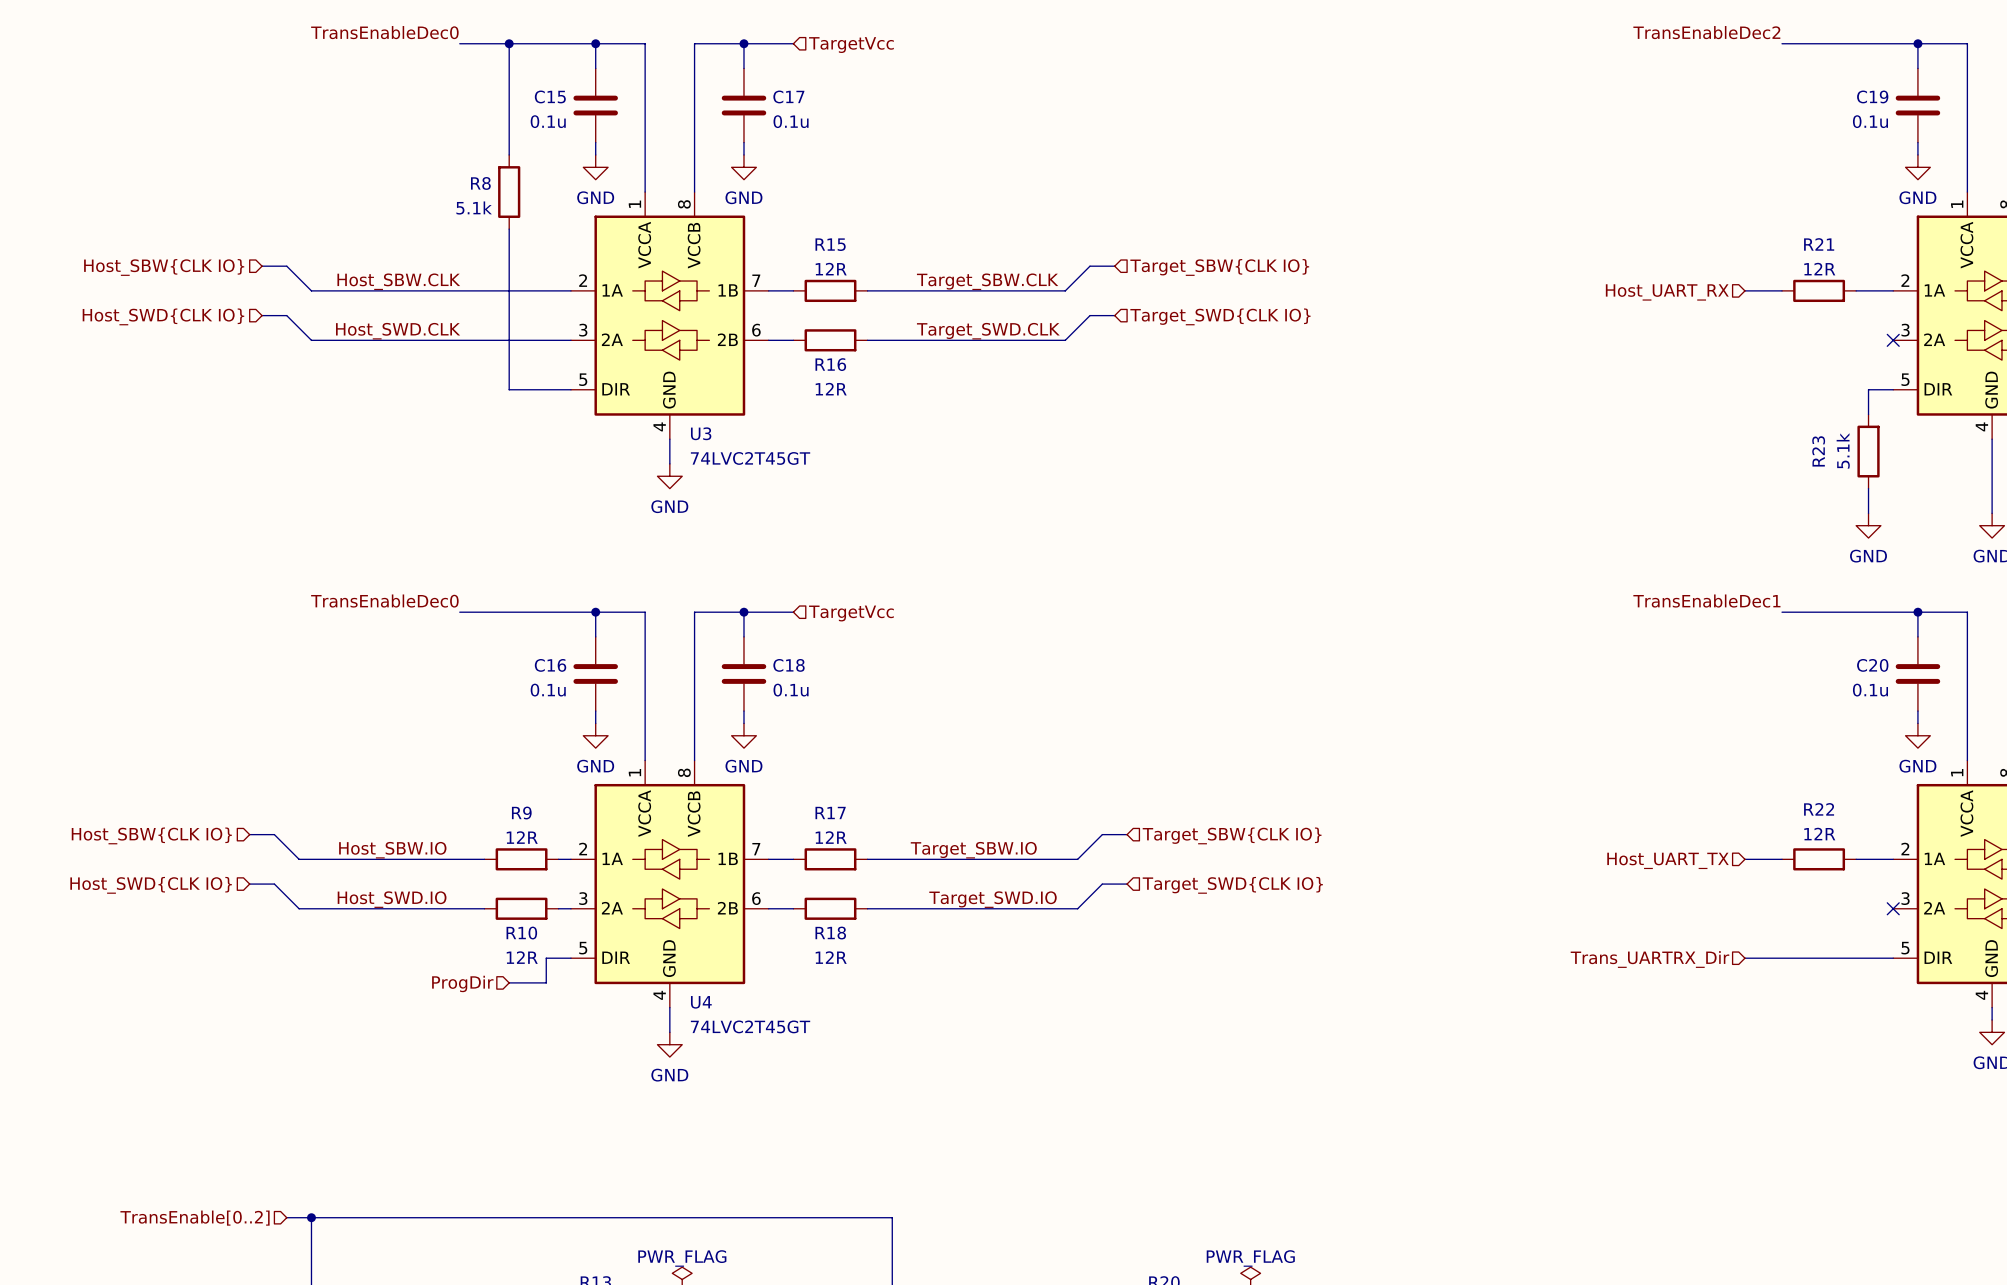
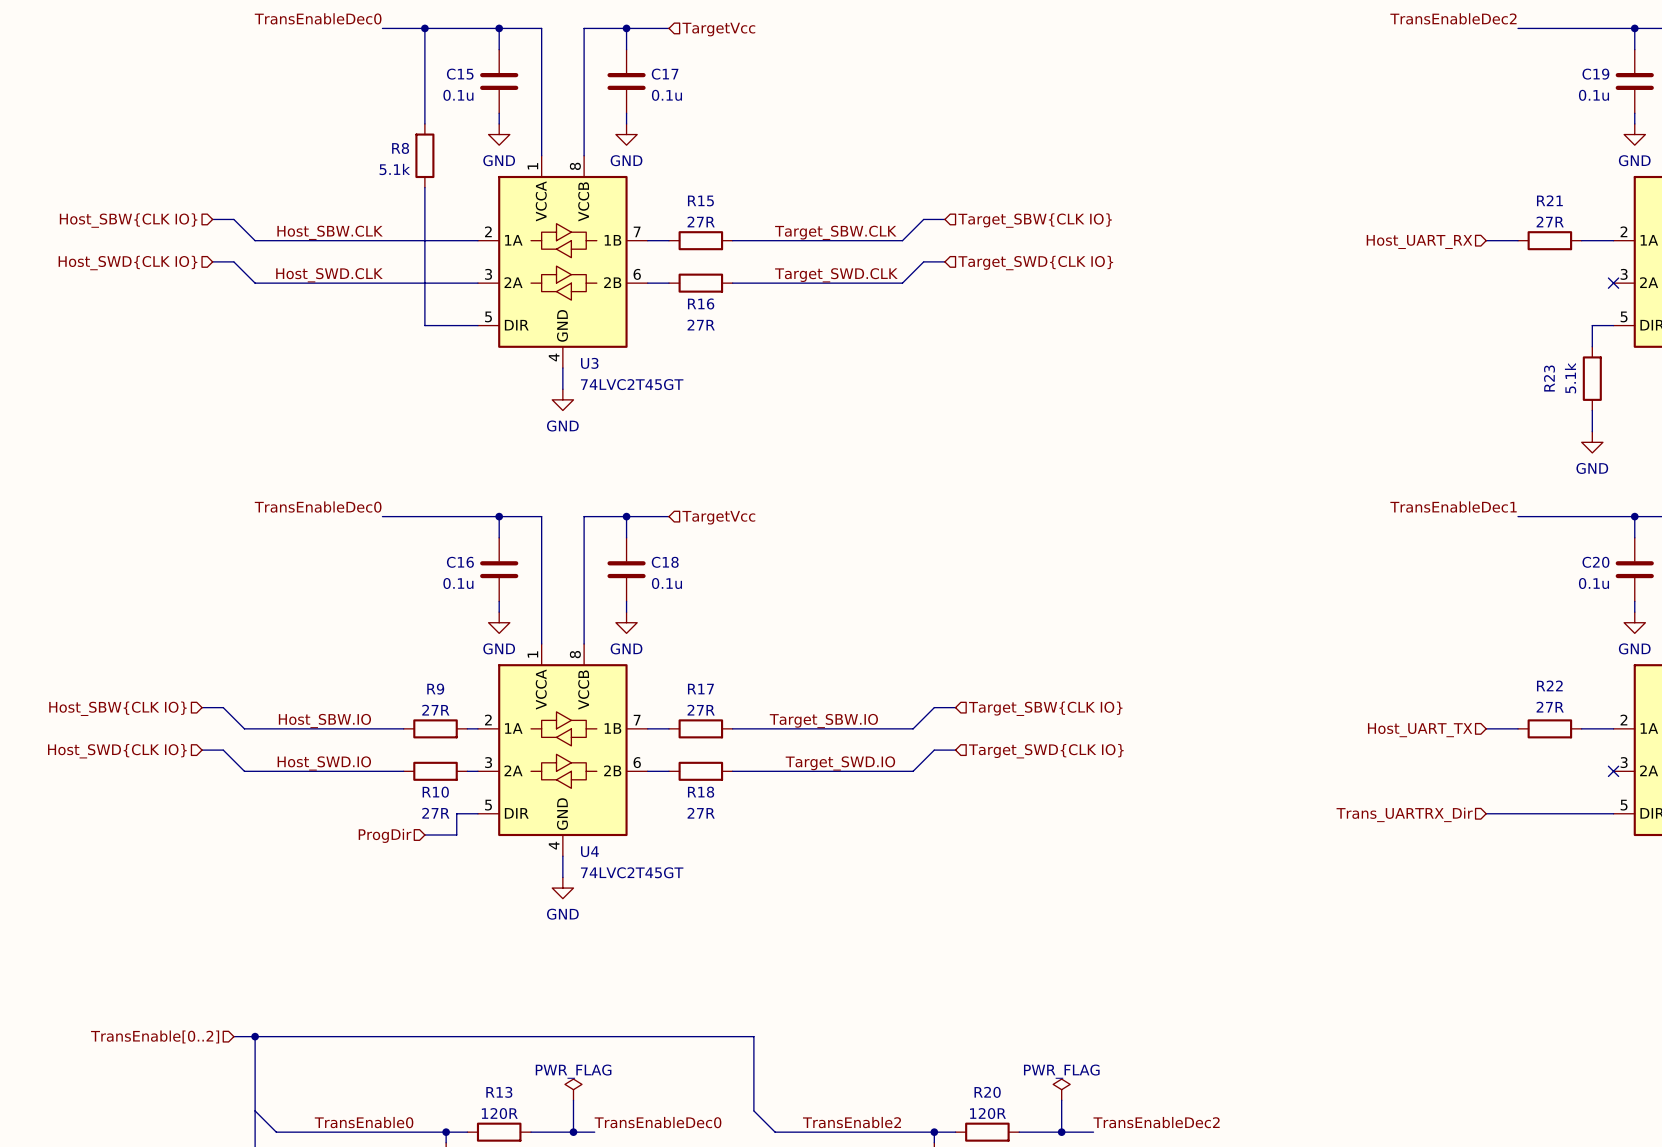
R15 value: 12R (831, 269) -> 27R (701, 221)
R21 value: 12R (1819, 269) -> 27R (1550, 221)
R16 value: 12R (831, 389) -> 27R (701, 325)
R22 value: 12R (1819, 834) -> 27R (1550, 707)
R9 value: 12R (522, 837) -> 27R (435, 710)
R17 value: 12R (831, 837) -> 27R (701, 710)
R10 value: 12R (522, 957) -> 27R (435, 813)
R18 value: 12R (831, 957) -> 27R (701, 813)

